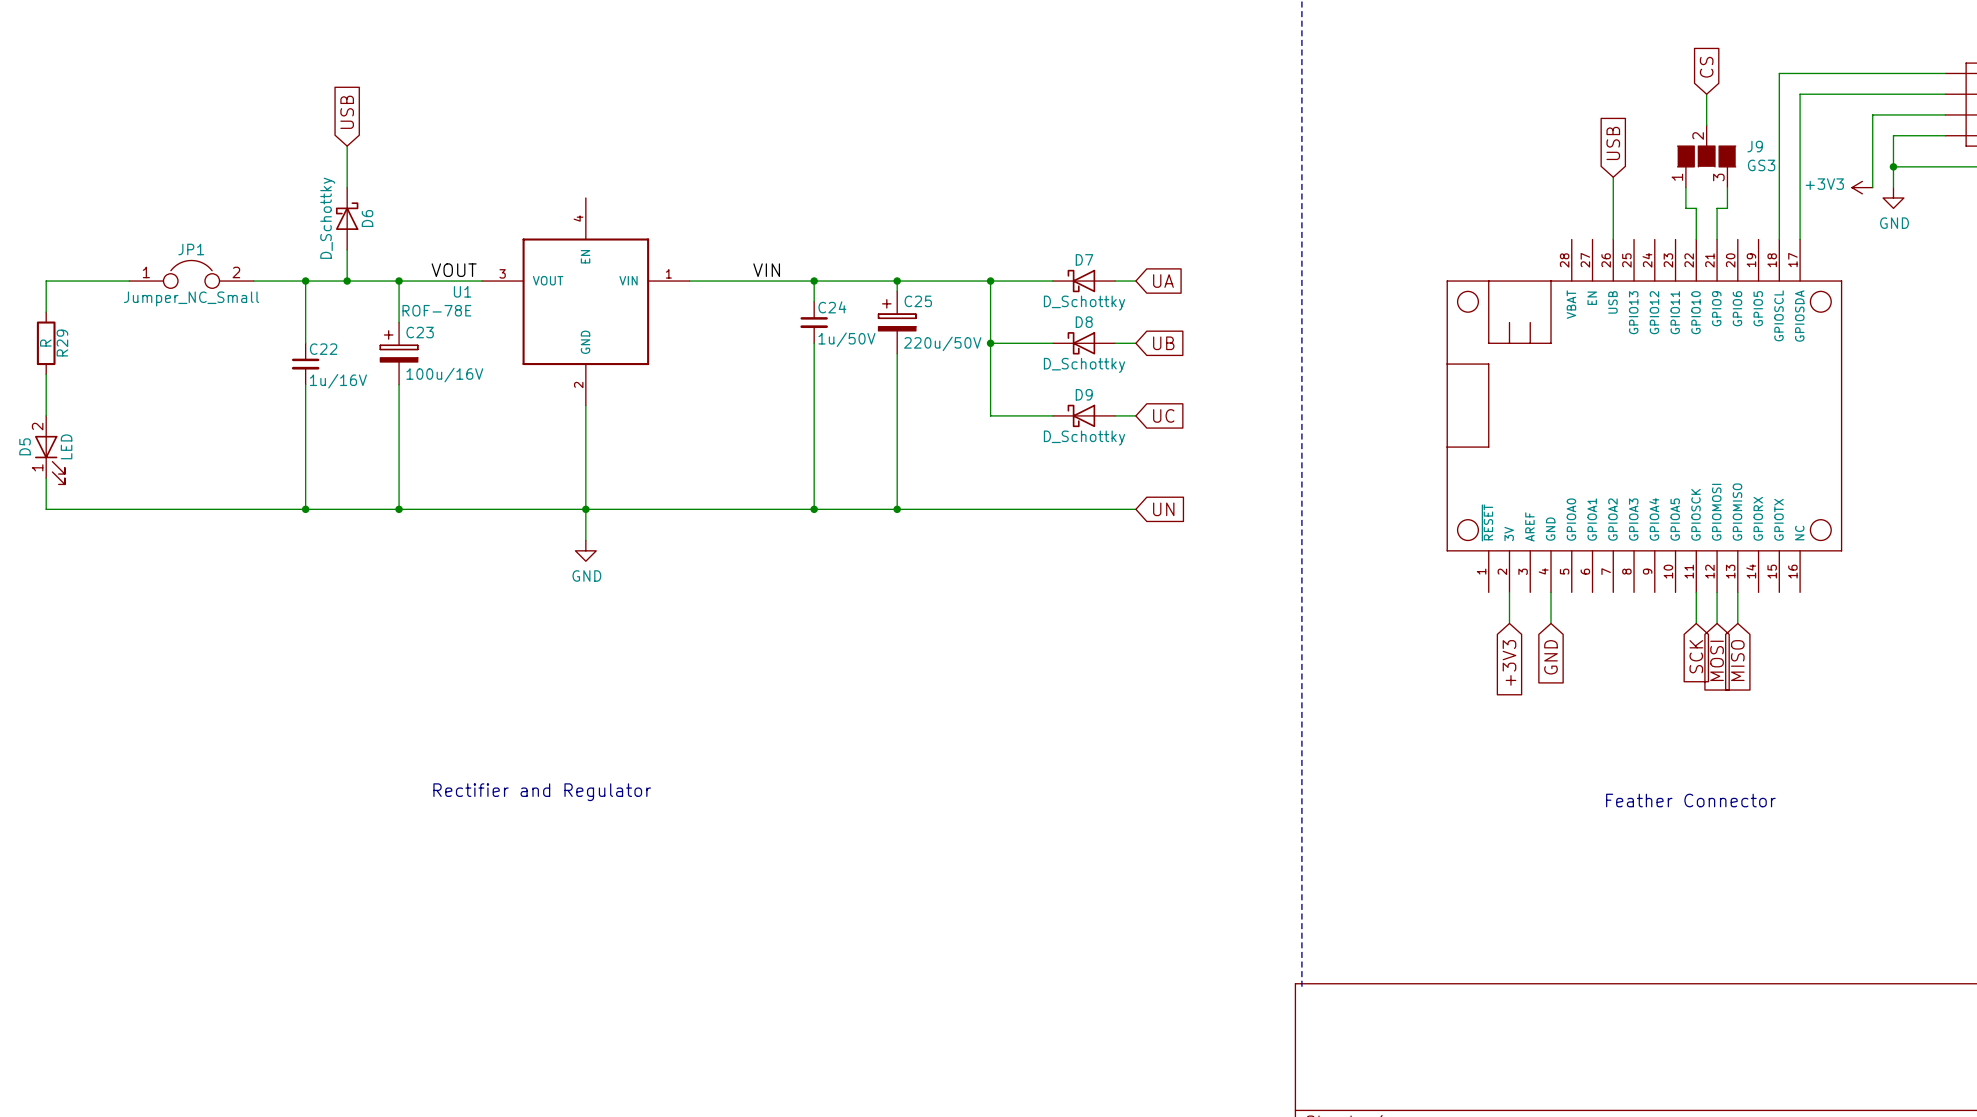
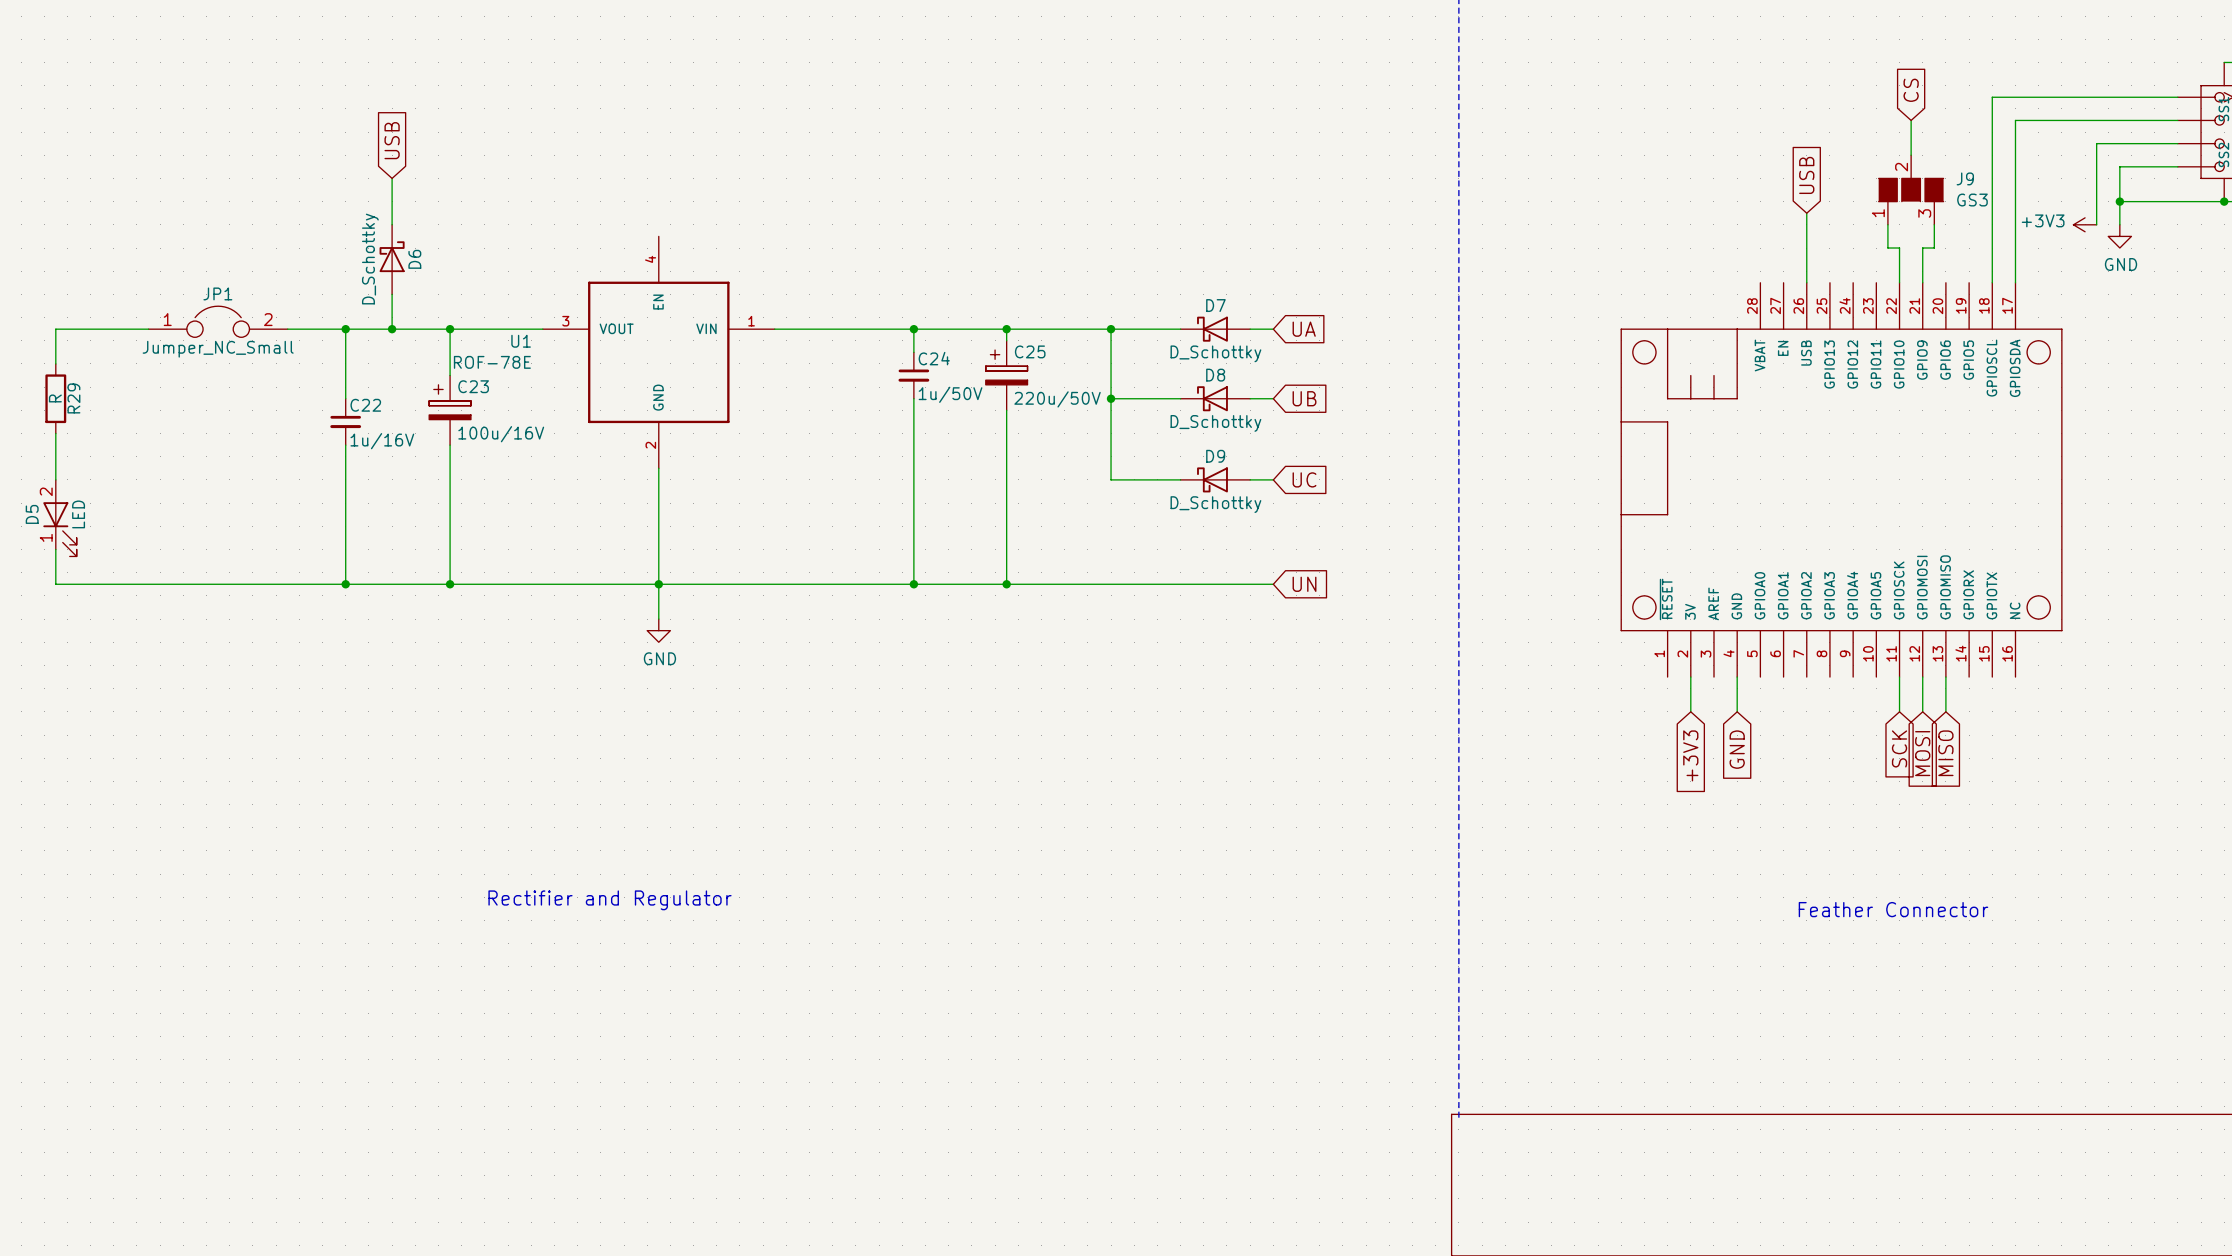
label: VOUT (454, 270) -> none
label: VIN (766, 270) -> none

